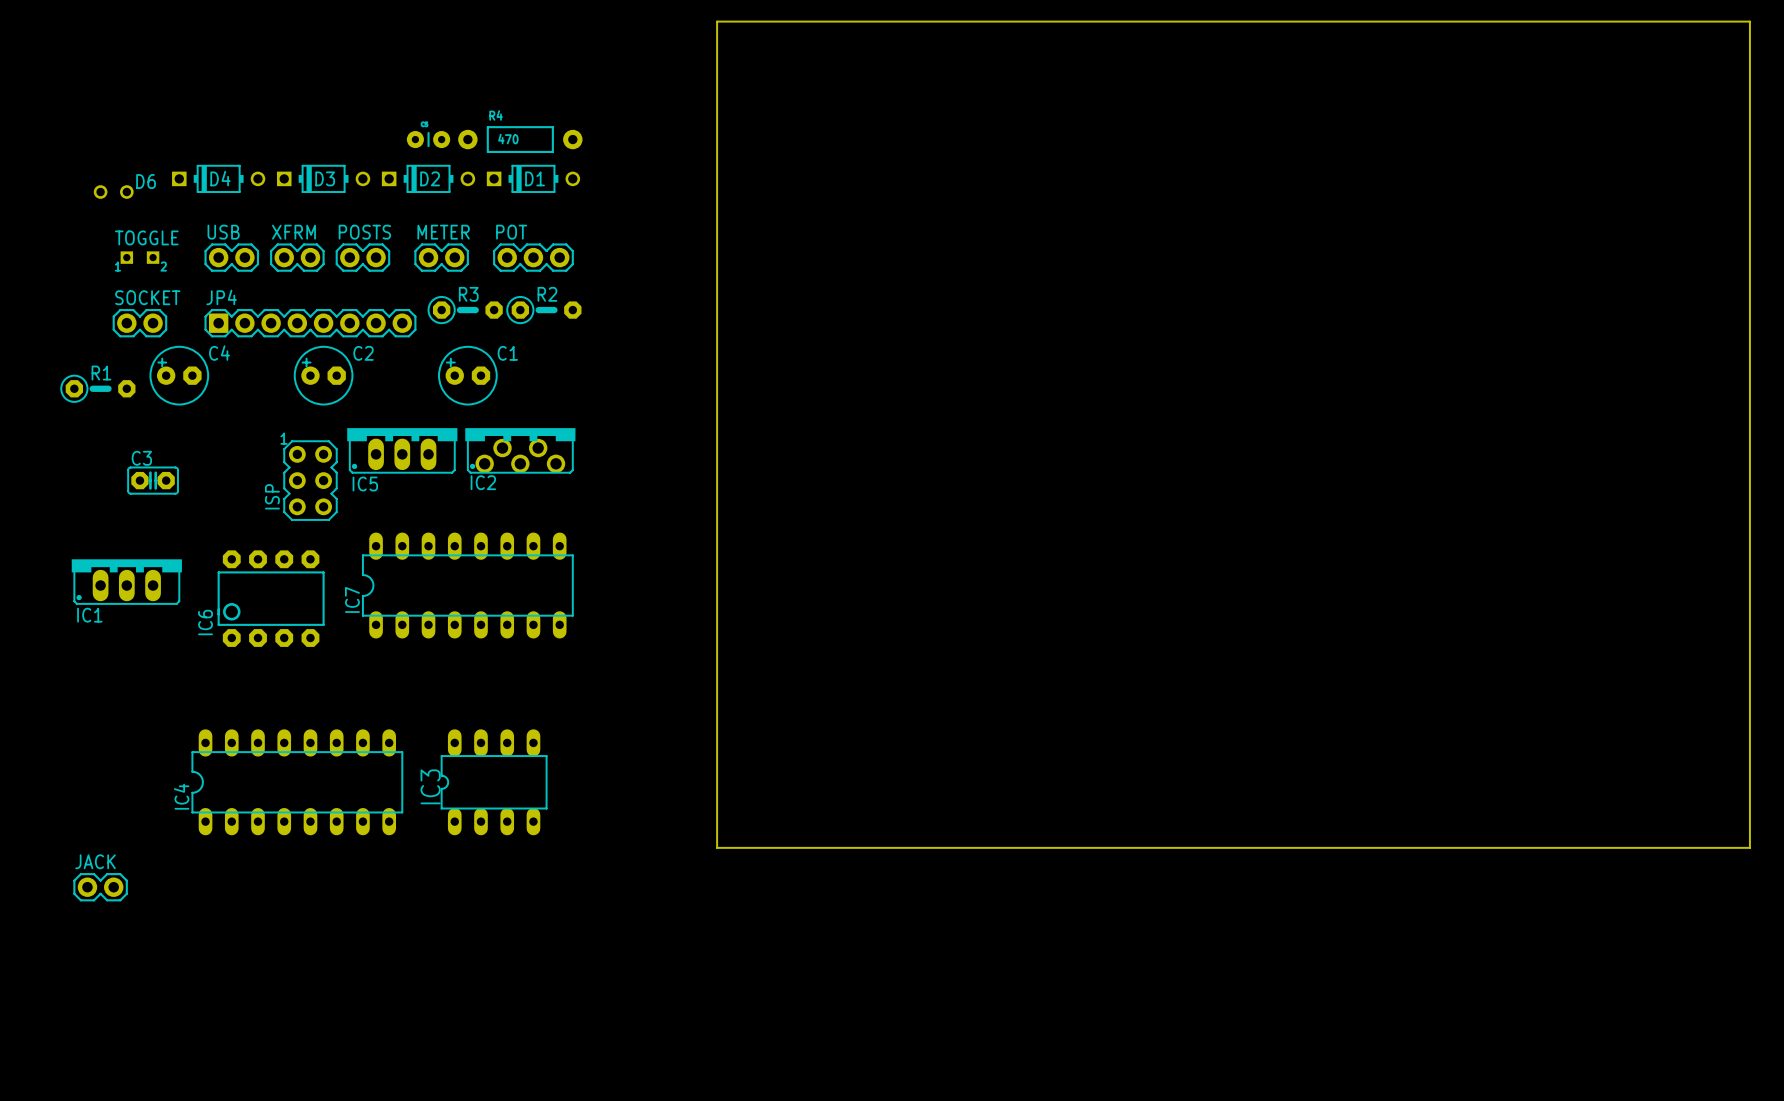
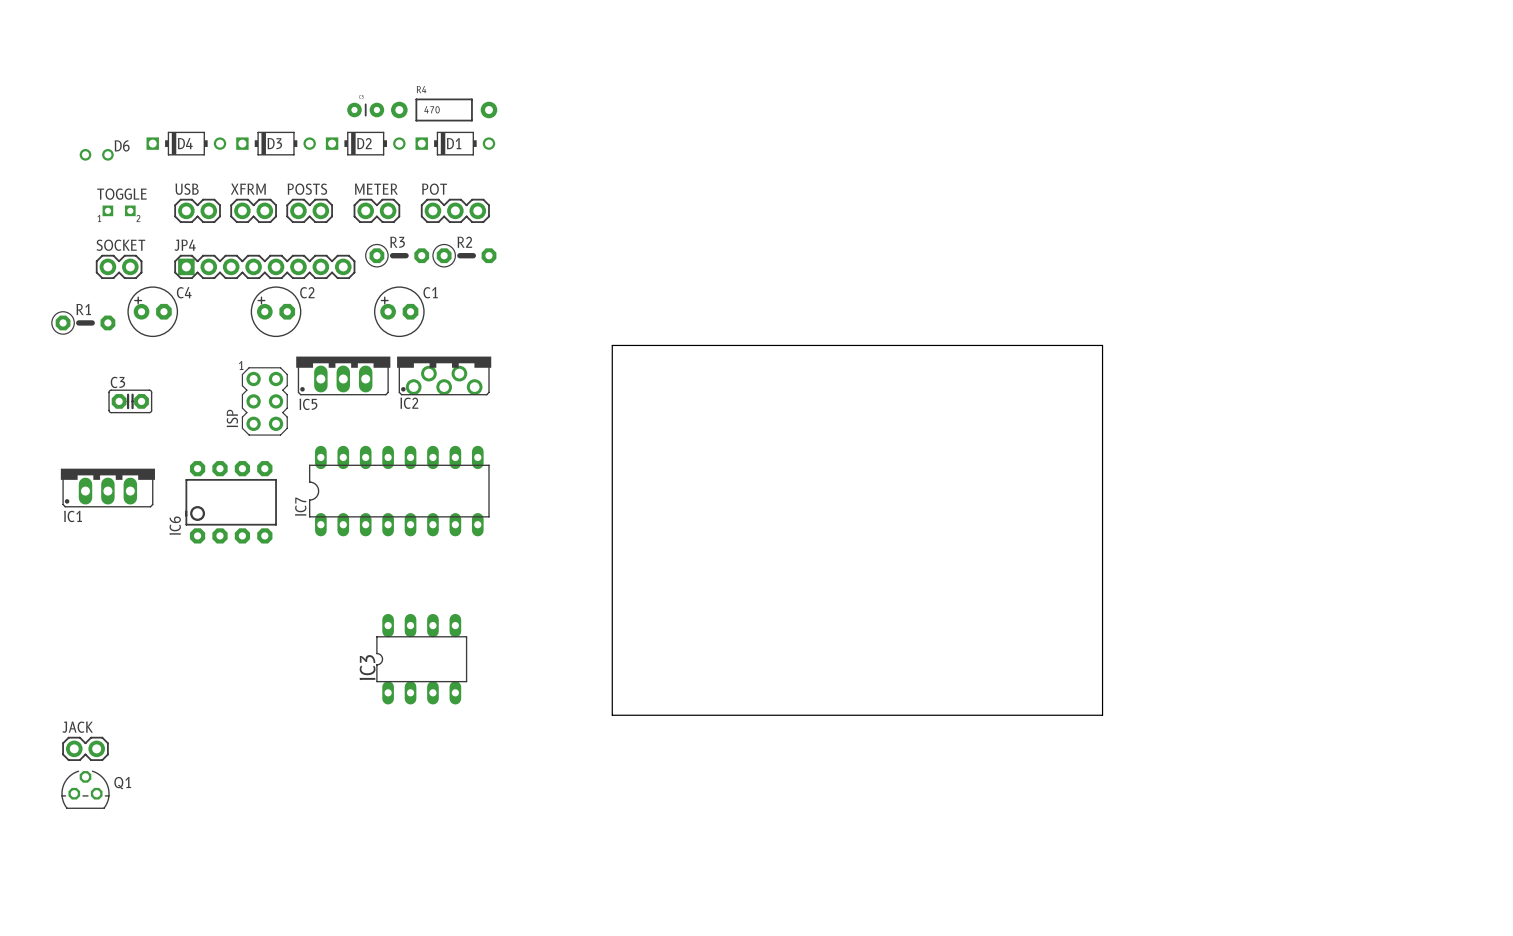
board edge: (717, 415) (717, 21) (1749, 21) (1749, 847) (1290, 847) -> (612, 345) (1102, 345) (1102, 715)
IC4: (297, 782) -> none
Q1: none -> (85, 789)

